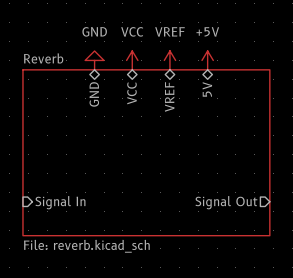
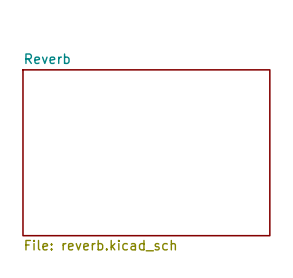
power symbol: GND (94, 60) -> none
power symbol: VCC (132, 60) -> none
power symbol: VREF (169, 60) -> none
power symbol: +5V (207, 60) -> none
sheet pin: 5V (207, 89) -> none
sheet pin: VCC (131, 93) -> none
sheet pin: GND (94, 94) -> none
sheet pin: VREF (169, 96) -> none
sheet pin: Signal In (60, 202) -> none
sheet pin: Signal Out (226, 202) -> none

